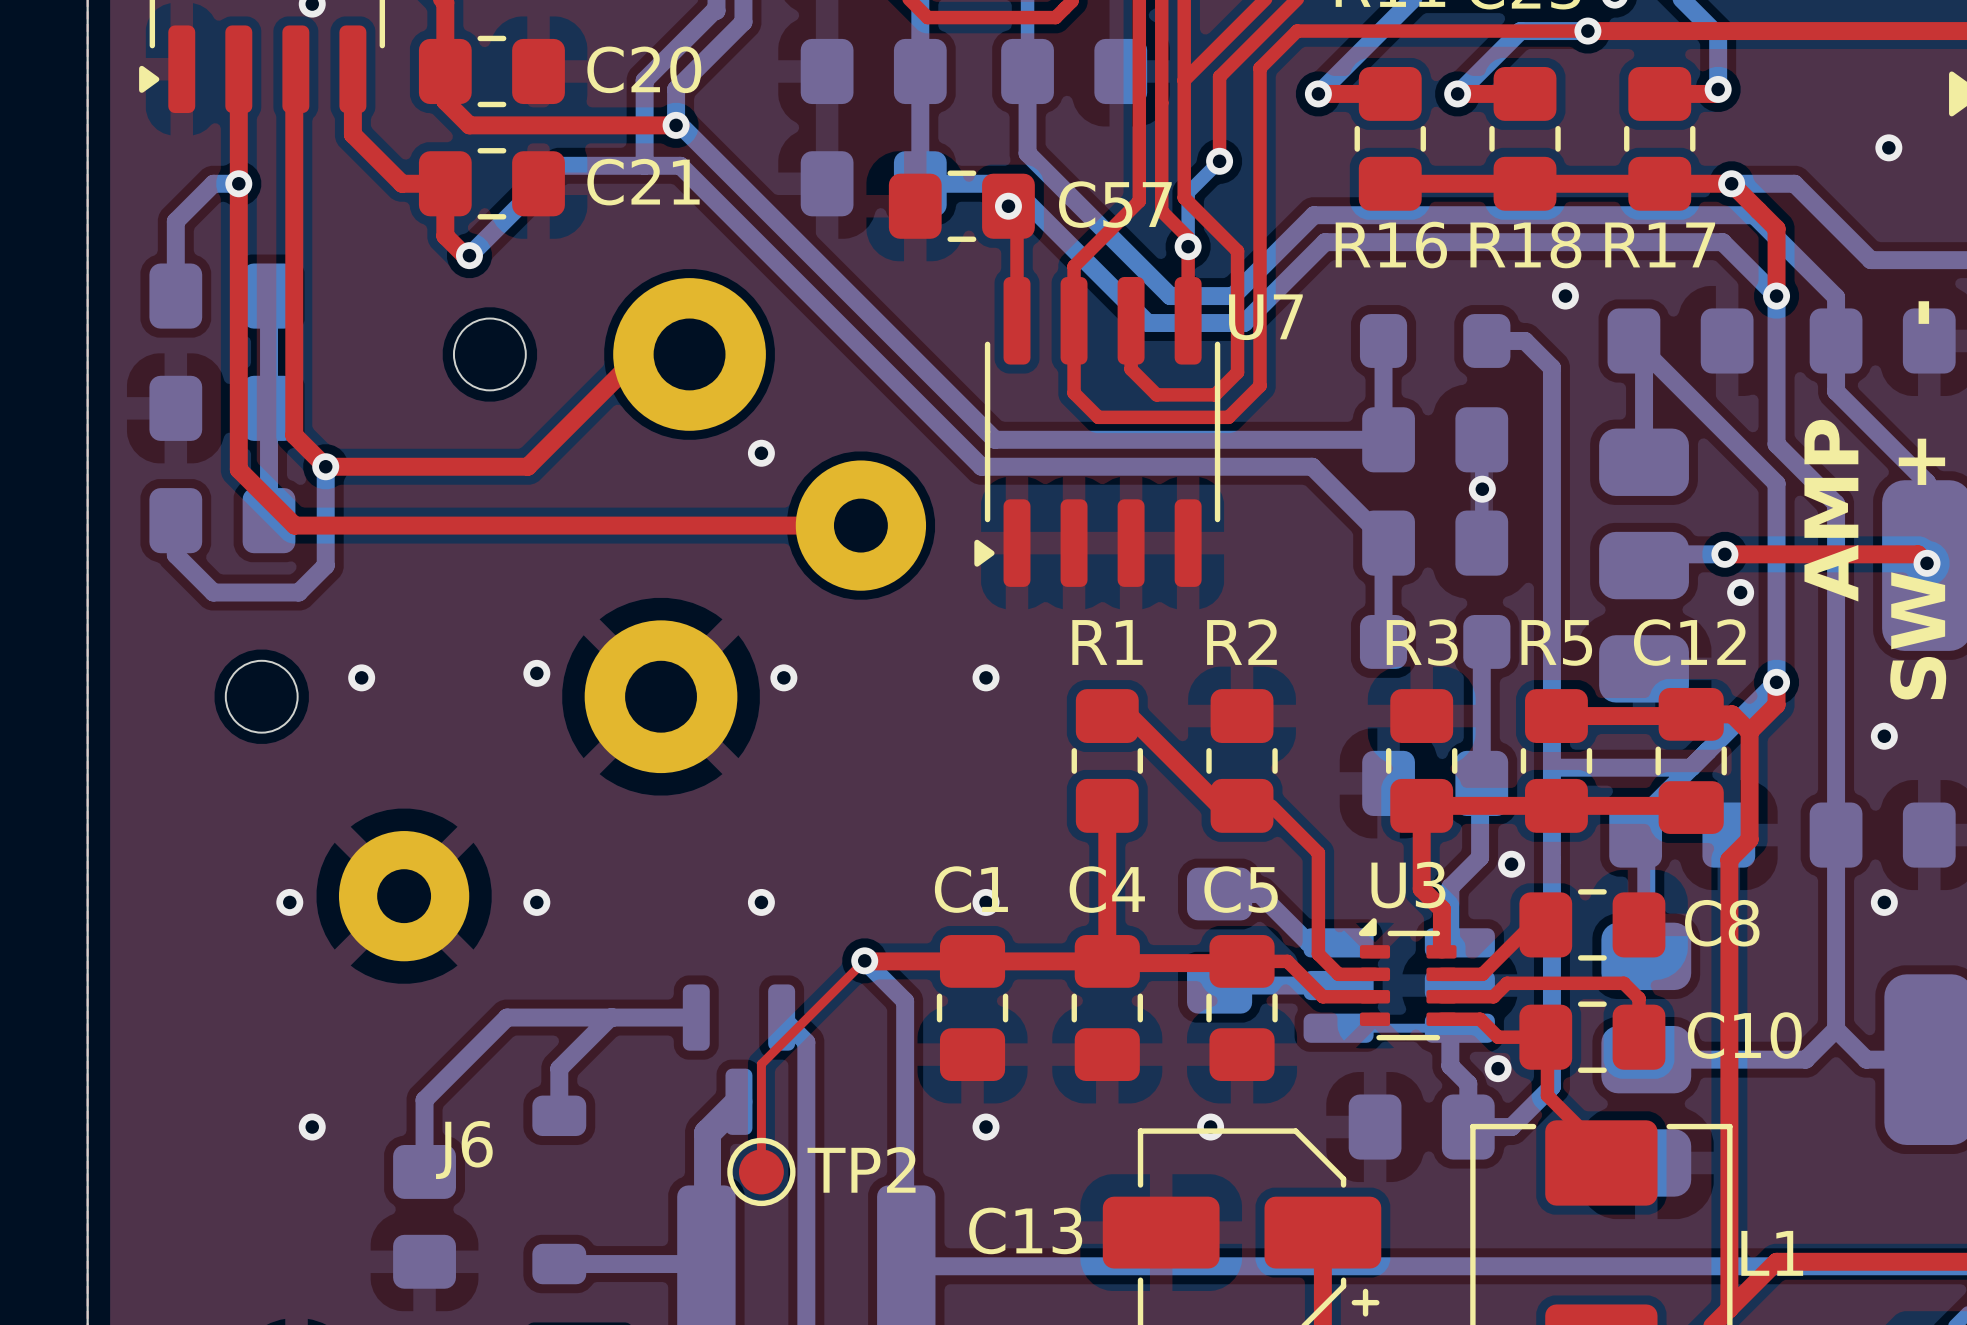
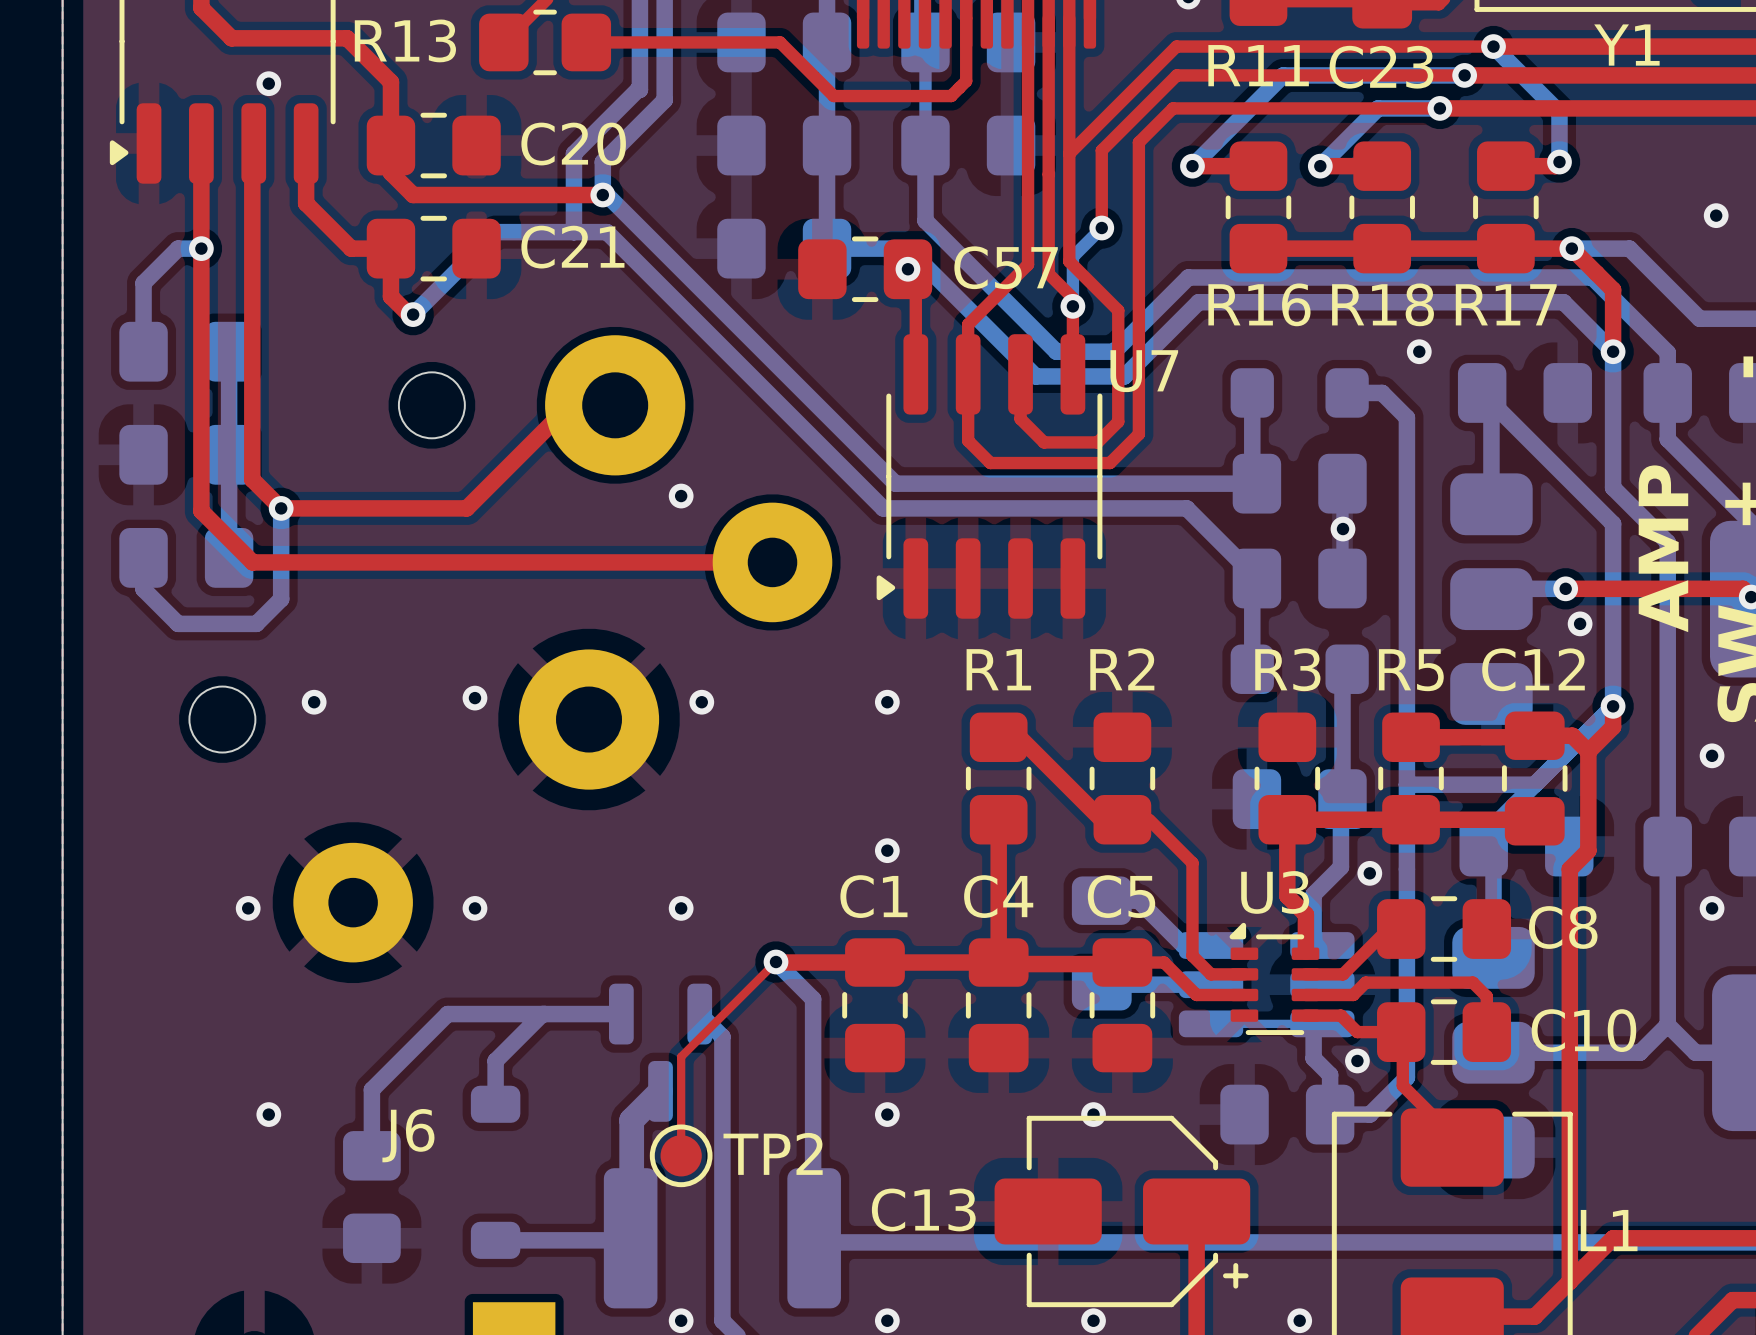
via position: (986, 902) -> (887, 850)

